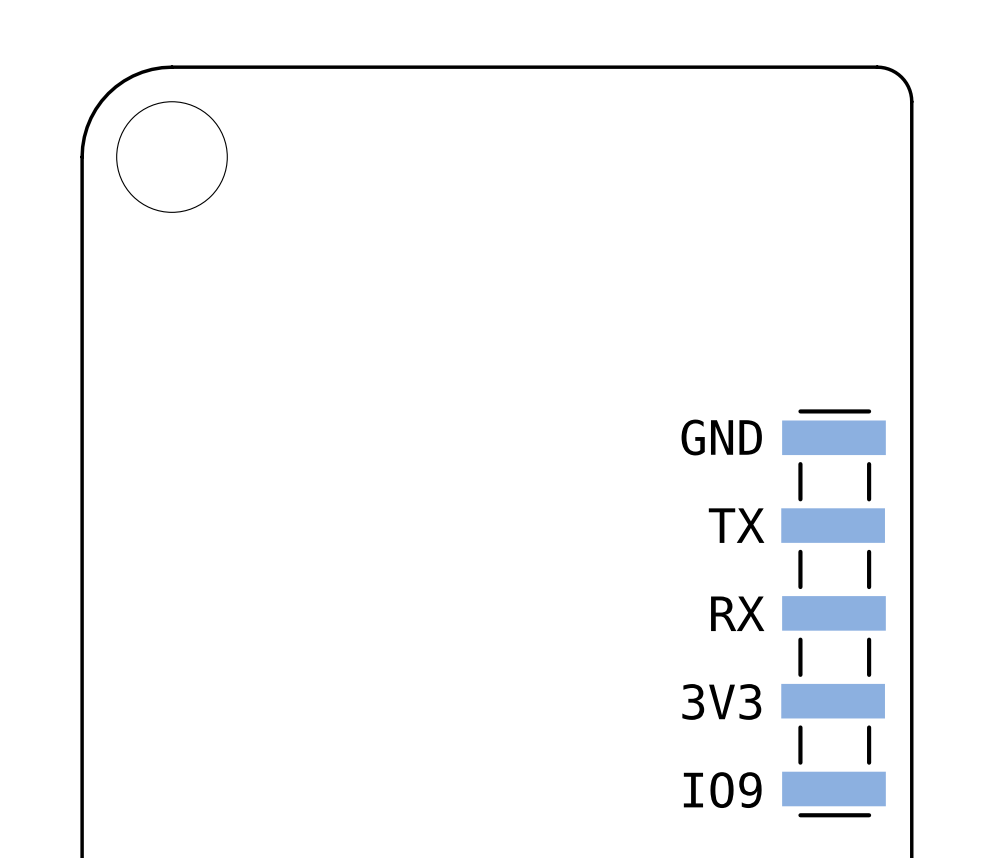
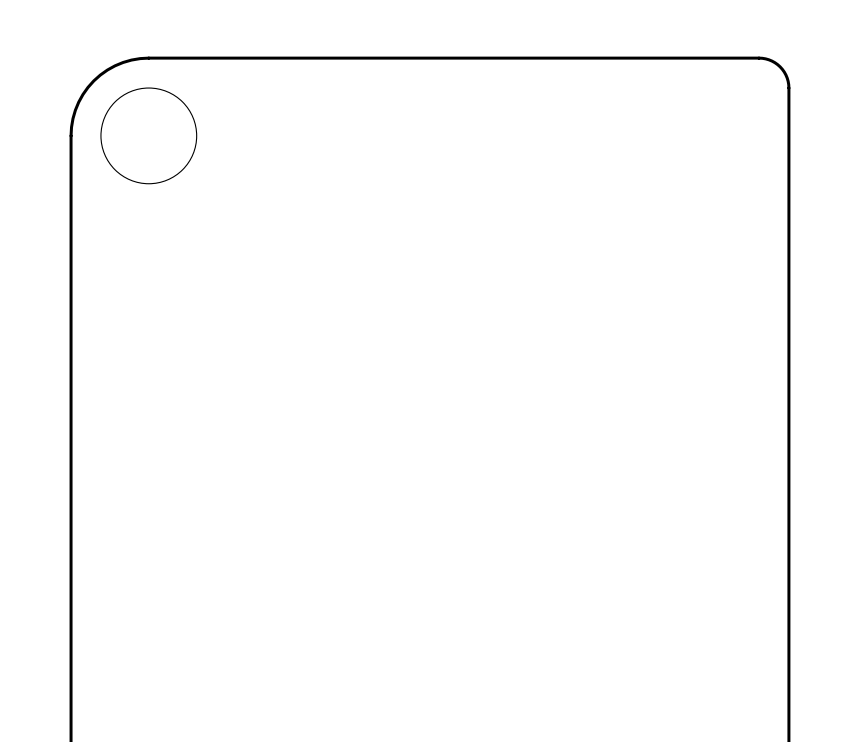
text: GND (721, 437) -> none
text: TX (736, 525) -> none
text: RX (737, 613) -> none
part: (833, 613) -> none
text: 3V3 (721, 701) -> none
text: IO9 (722, 790) -> none

